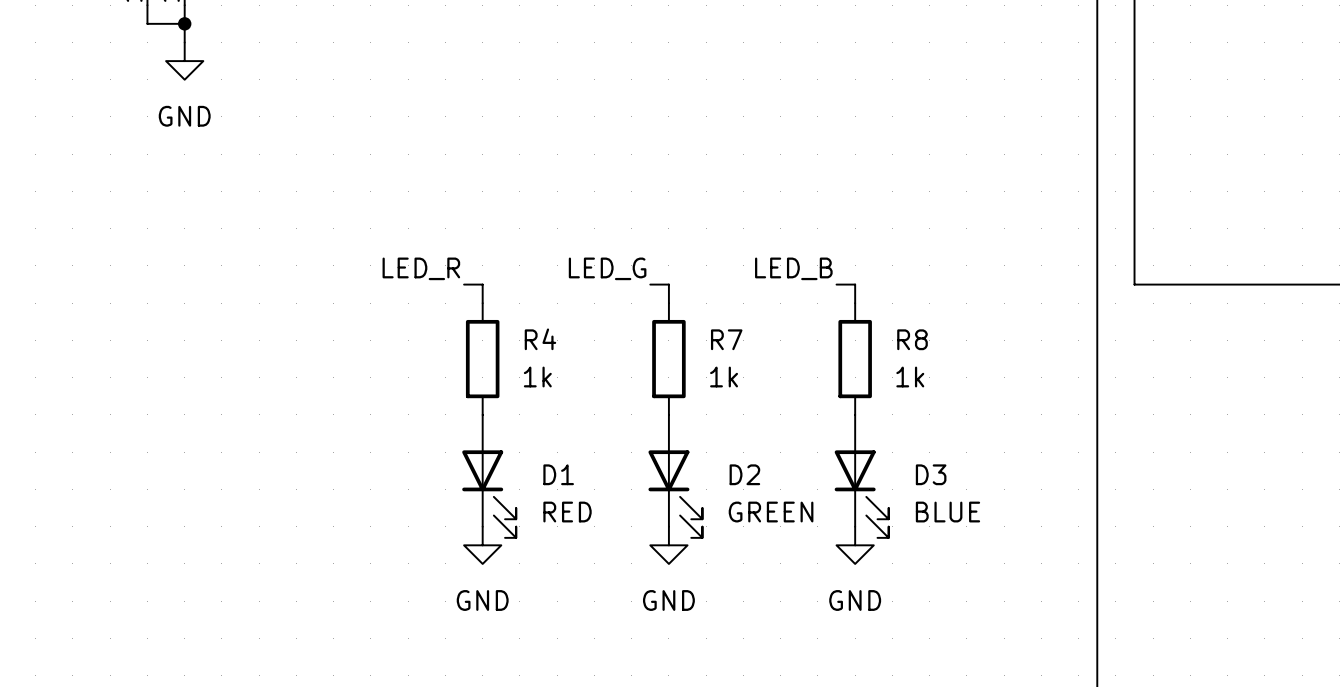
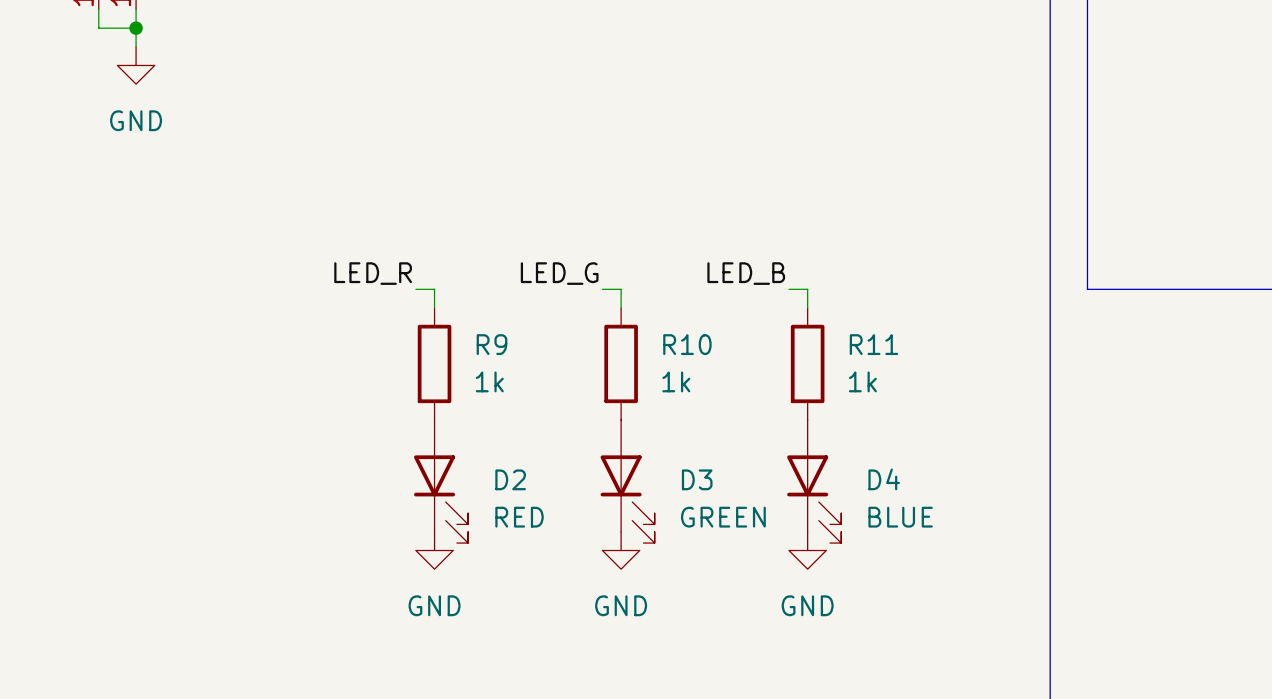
R4 name: R4 (540, 339) -> R9 (491, 344)
R7 name: R7 (726, 339) -> R10 (687, 344)
R8 name: R8 (912, 339) -> R11 (873, 344)
D1 name: D1 (558, 474) -> D2 (510, 479)
D2 name: D2 (744, 474) -> D3 (697, 479)
D3 name: D3 (931, 474) -> D4 (884, 479)

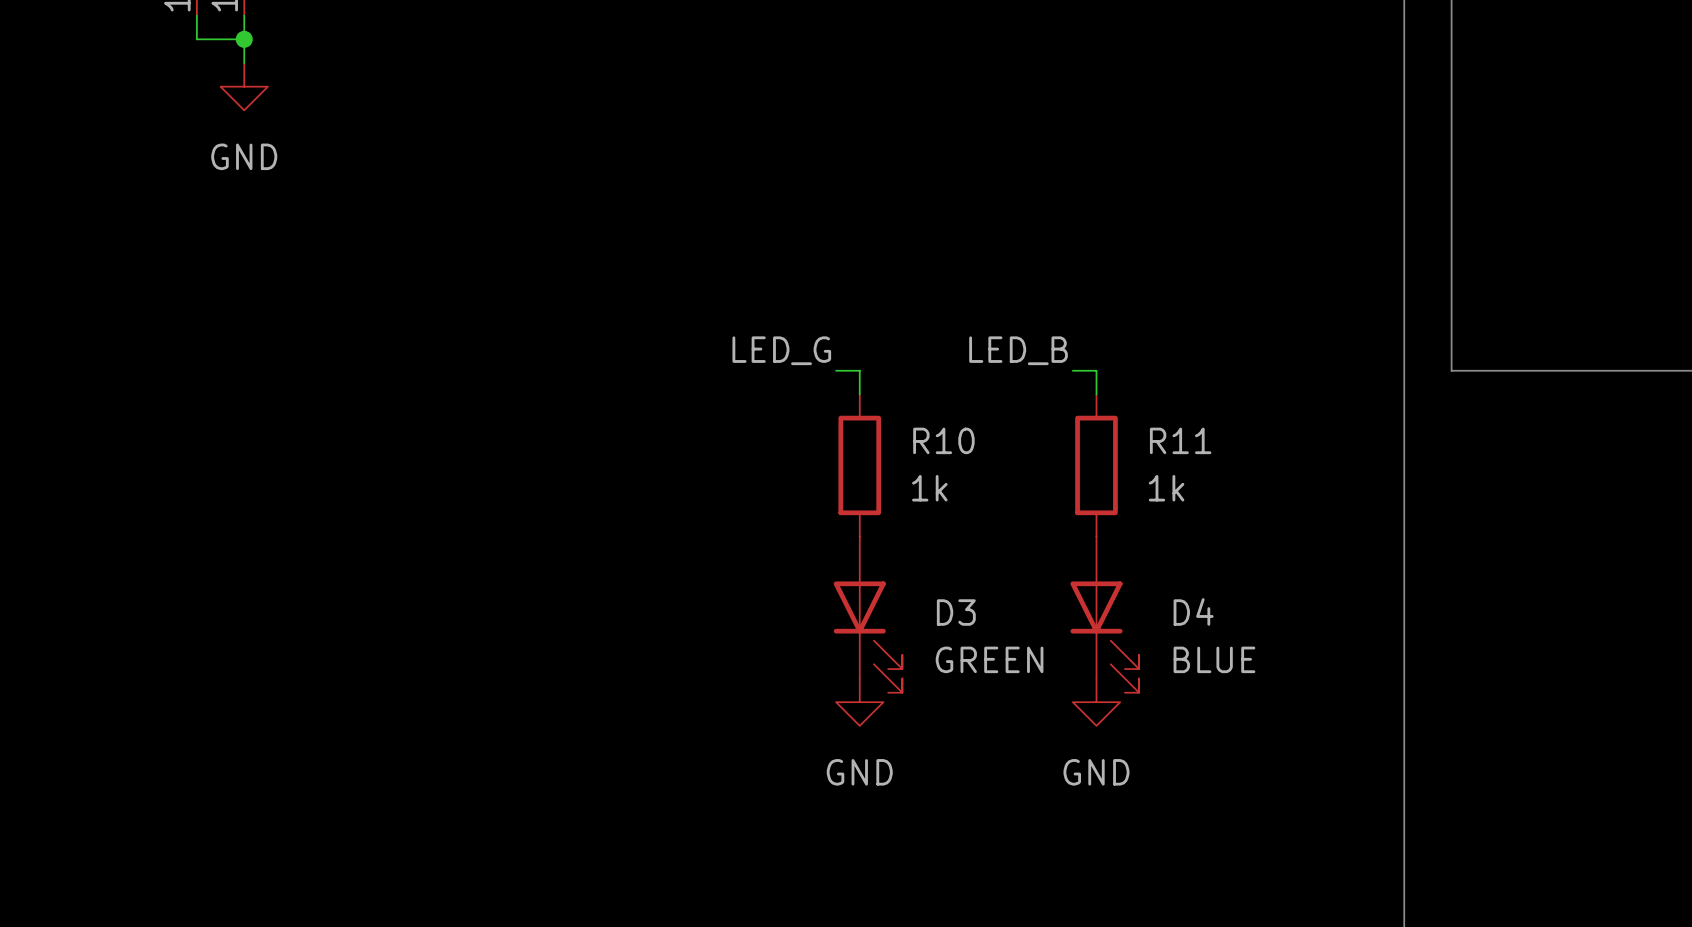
label: LED_R (373, 273) -> none
wire: (415, 289) (434, 289) (434, 307) -> none
R9: 1k (434, 363) -> none
D2: RED (441, 481) -> none
power symbol: GND (434, 550) -> none

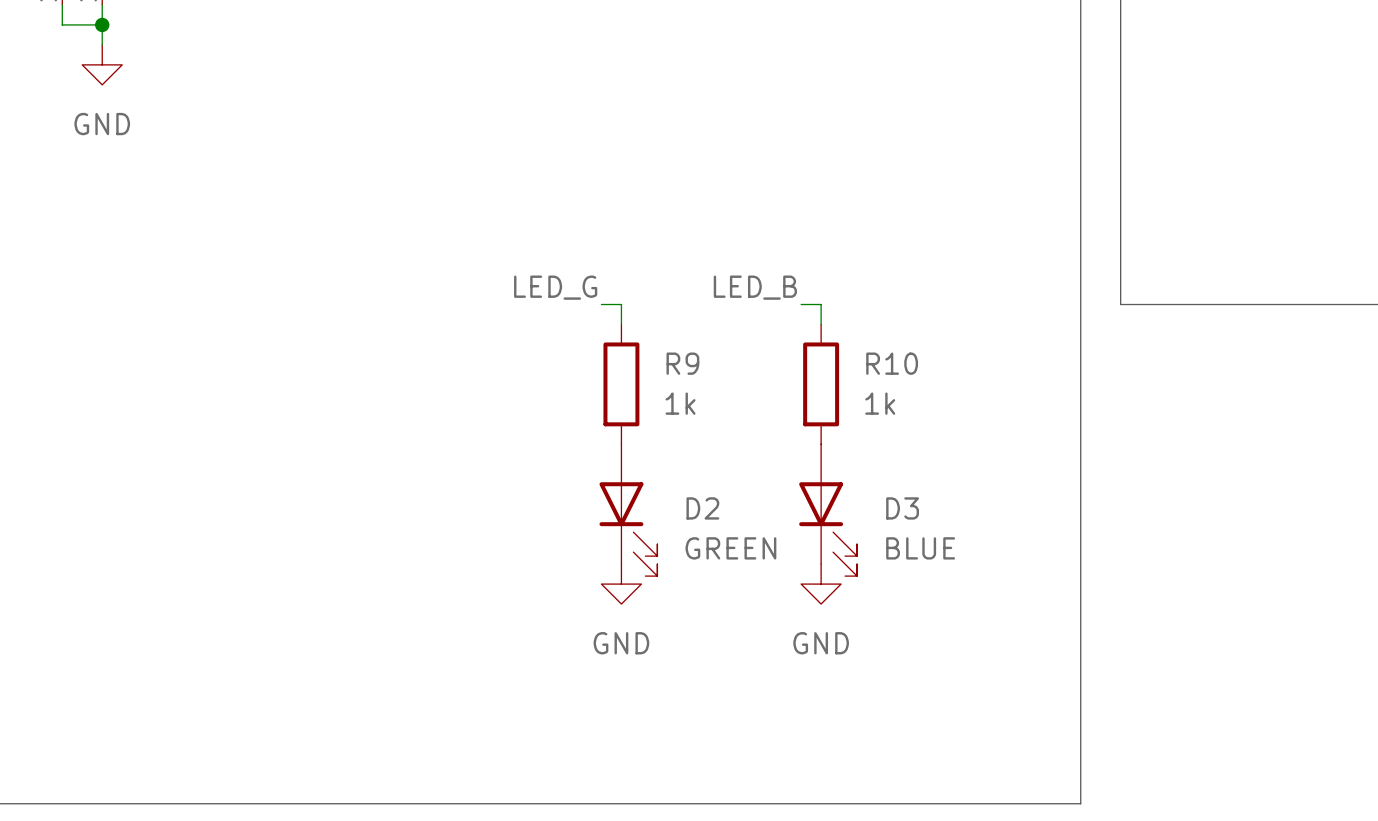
R10 name: R10 (943, 440) -> R9 (682, 363)
R11 name: R11 (1180, 440) -> R10 (892, 363)
D4 name: D4 (1193, 611) -> D3 (902, 508)
D3 name: D3 (956, 612) -> D2 (702, 508)

